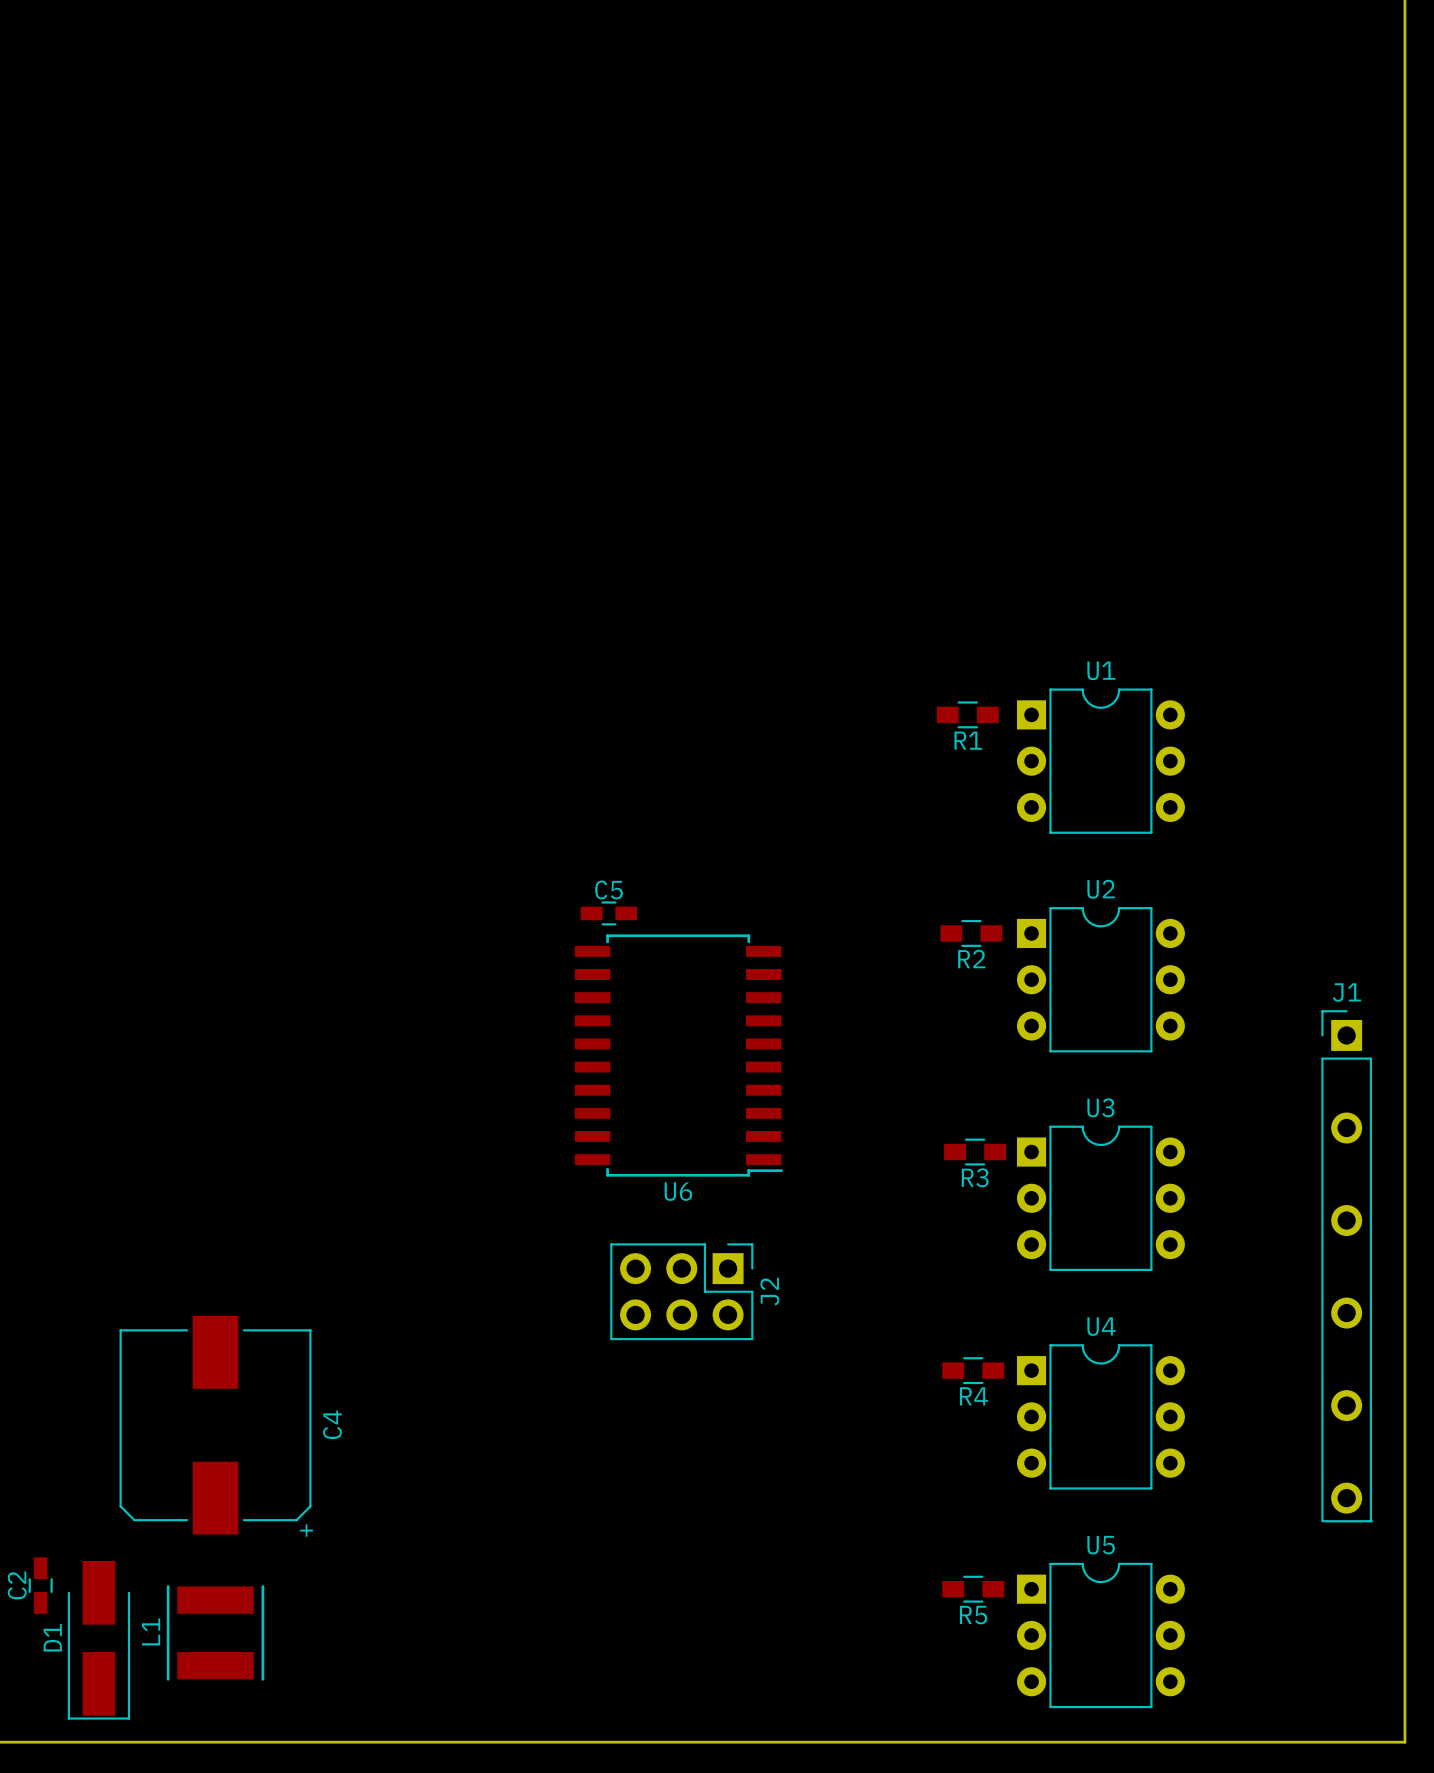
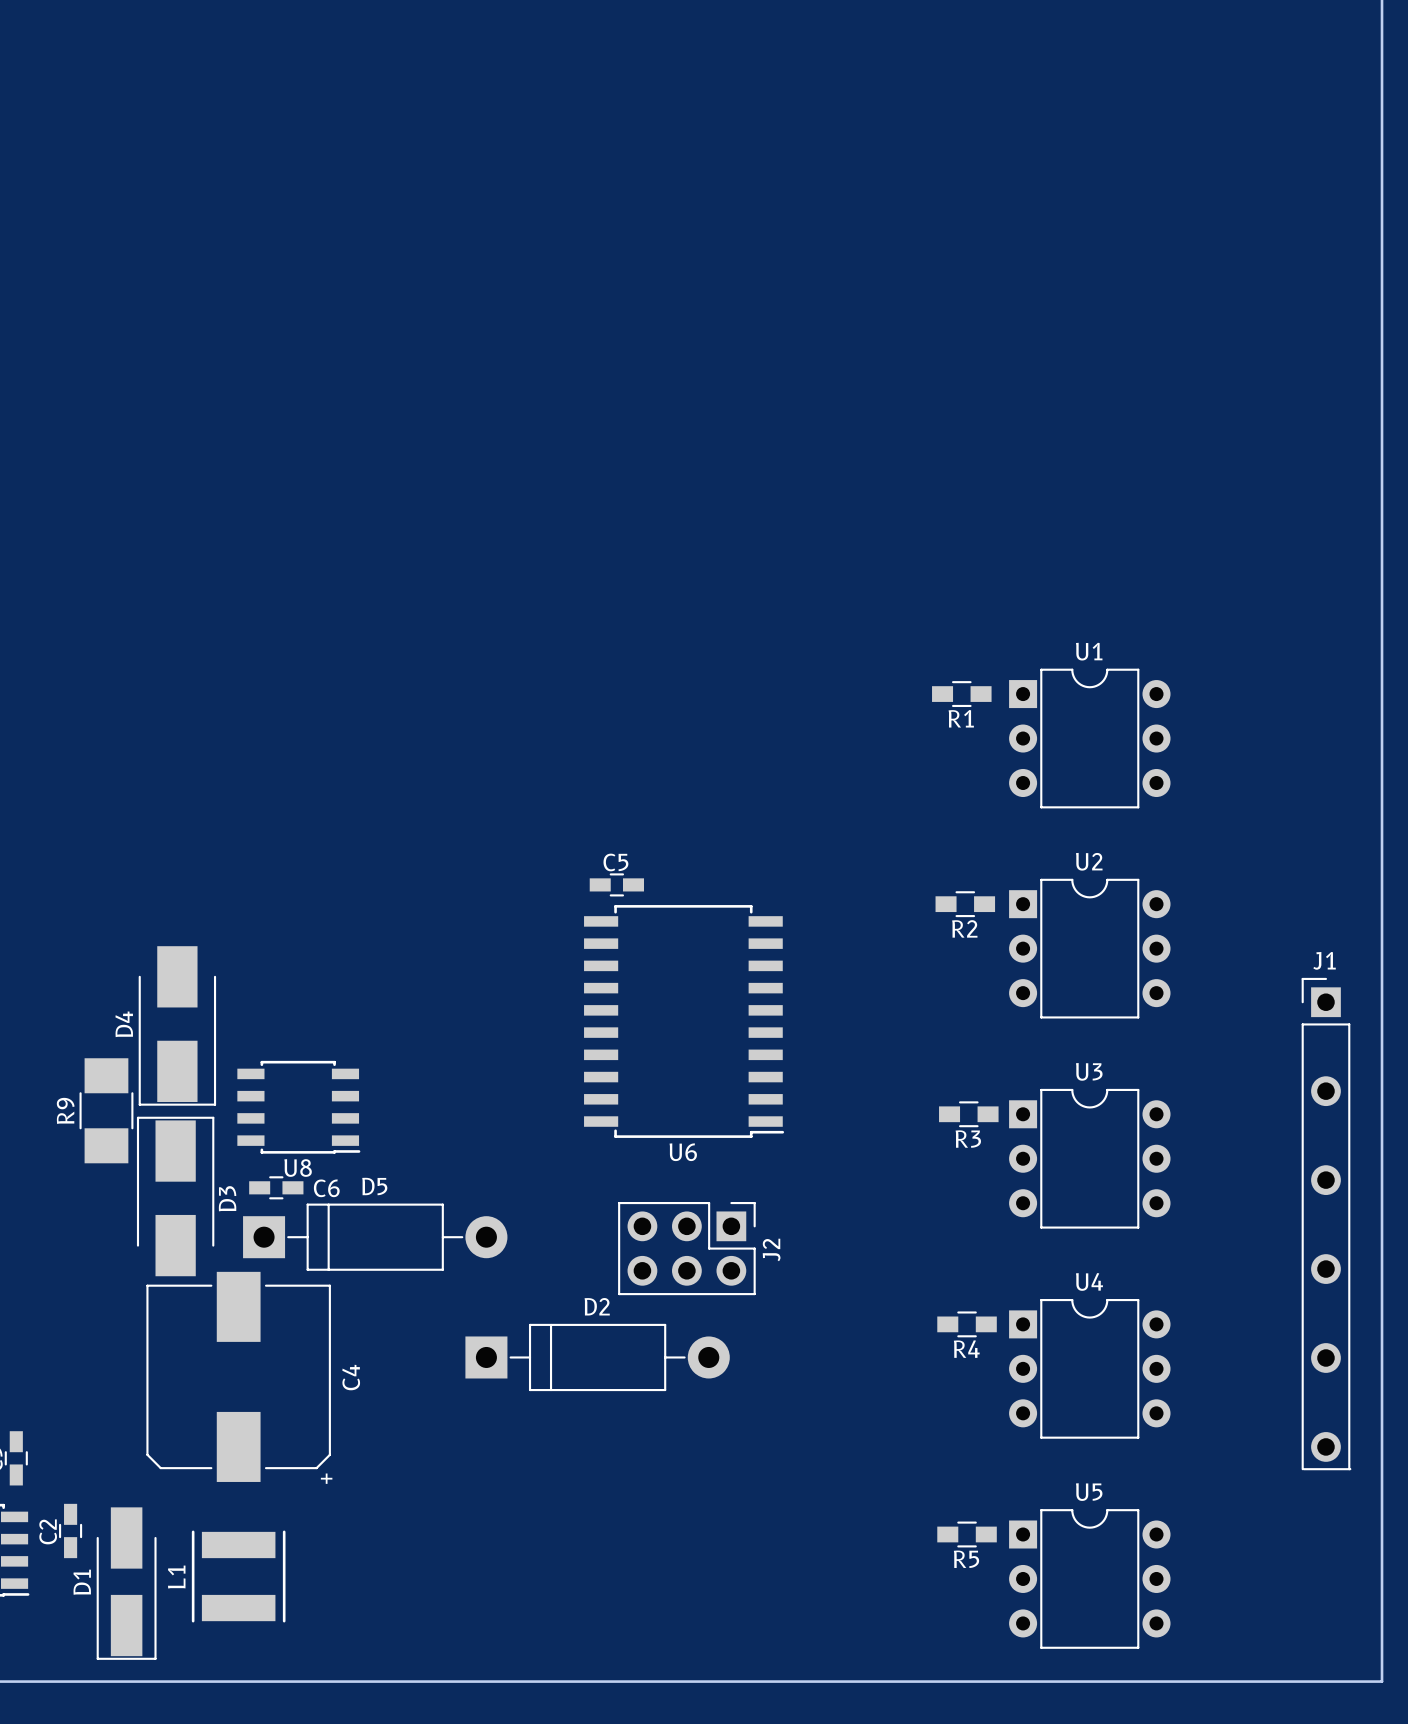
D4: none -> (177, 1025)
U8: none -> (298, 1107)
R9: none -> (106, 1110)
C6: none -> (276, 1187)
D3: none -> (175, 1196)
D5: none -> (375, 1237)
D2: none -> (597, 1357)

